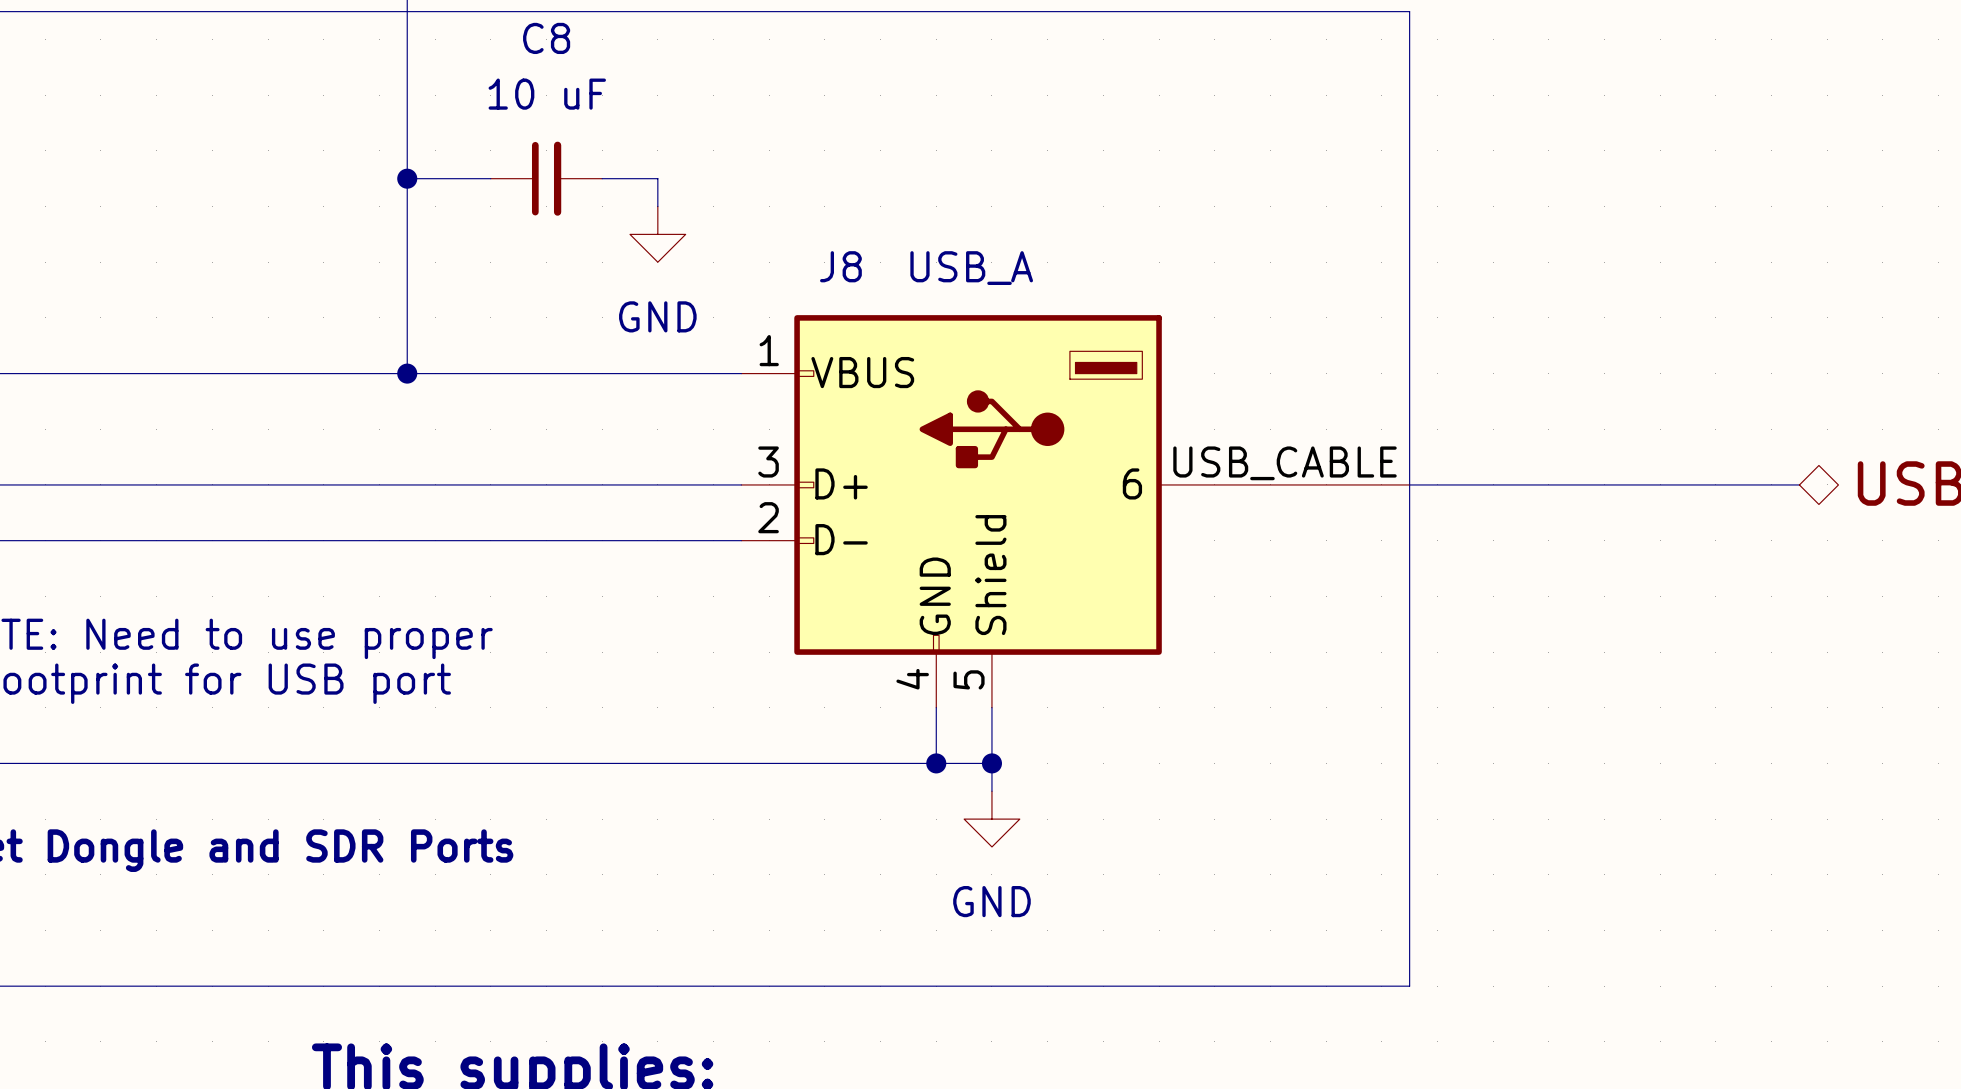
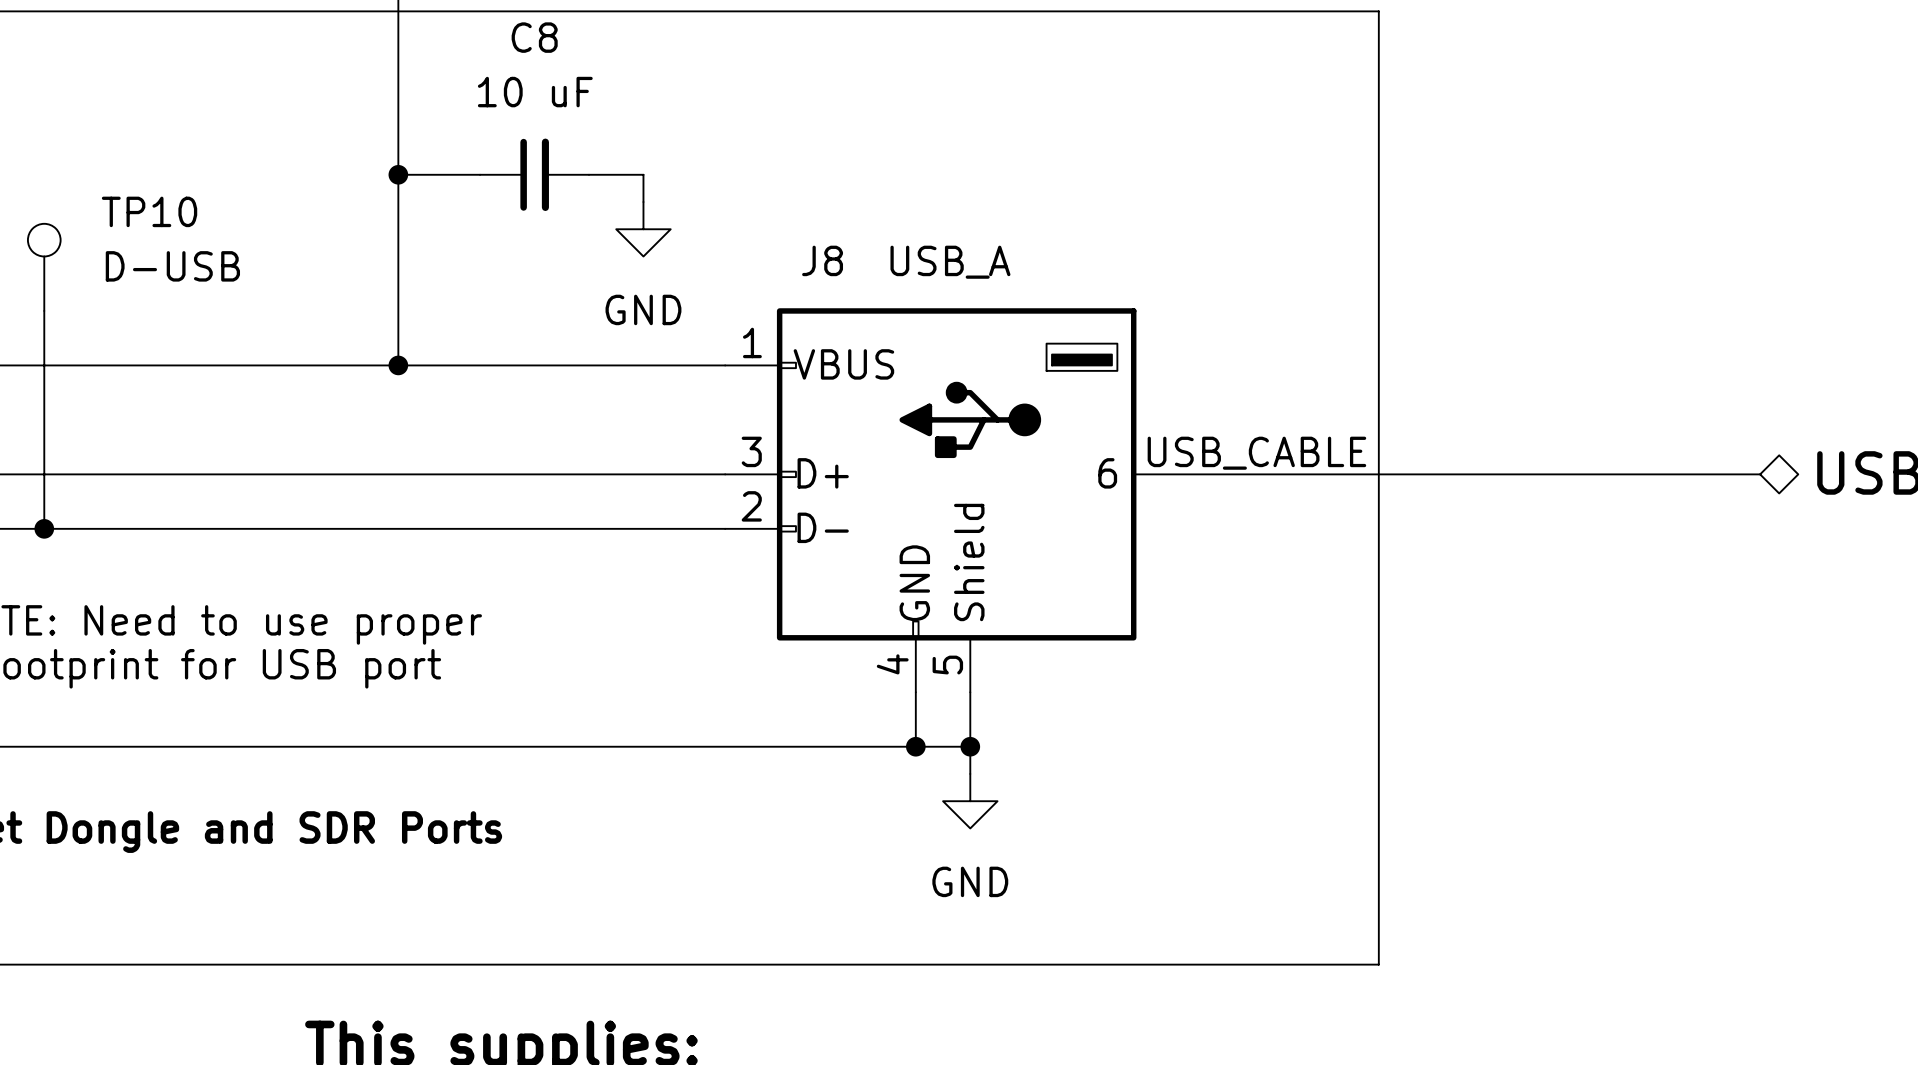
TP10: none -> D-USB (44, 267)
wire: none -> (44, 310) (44, 528)
junction: none -> (44, 528)

